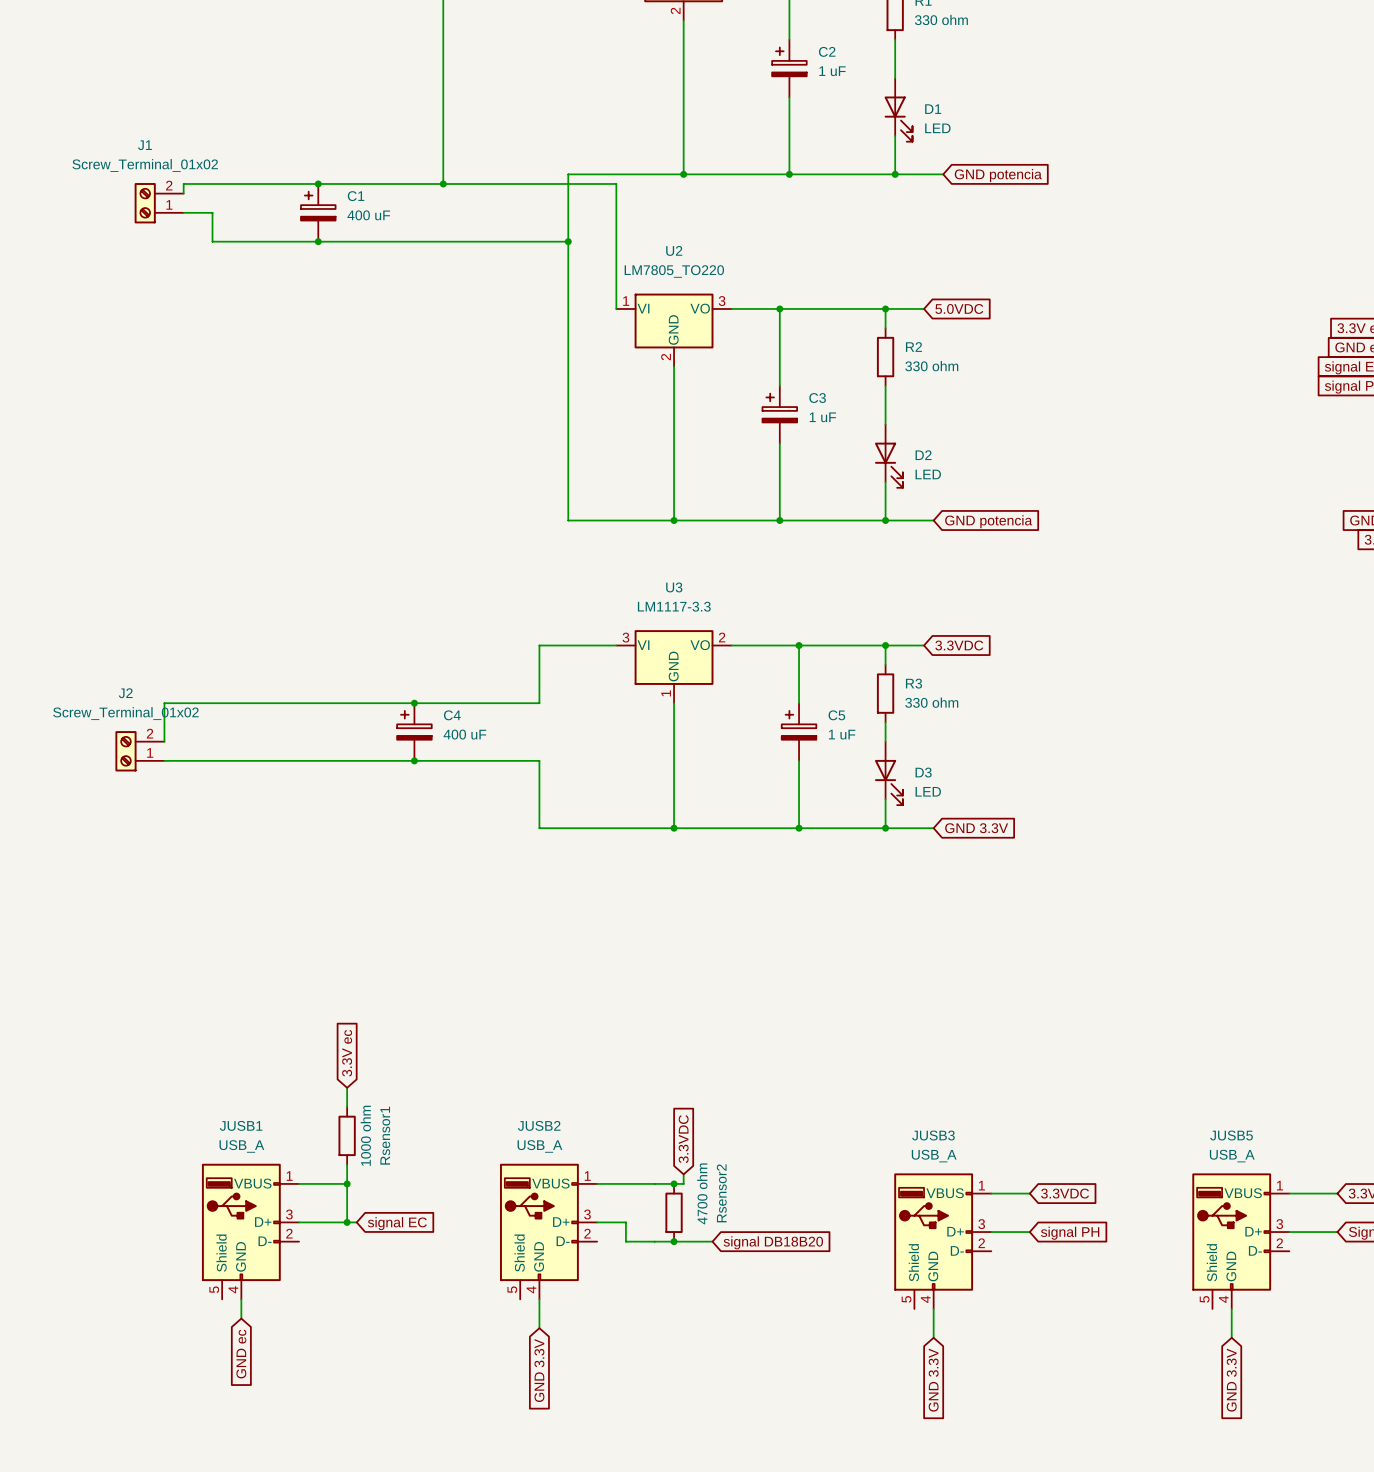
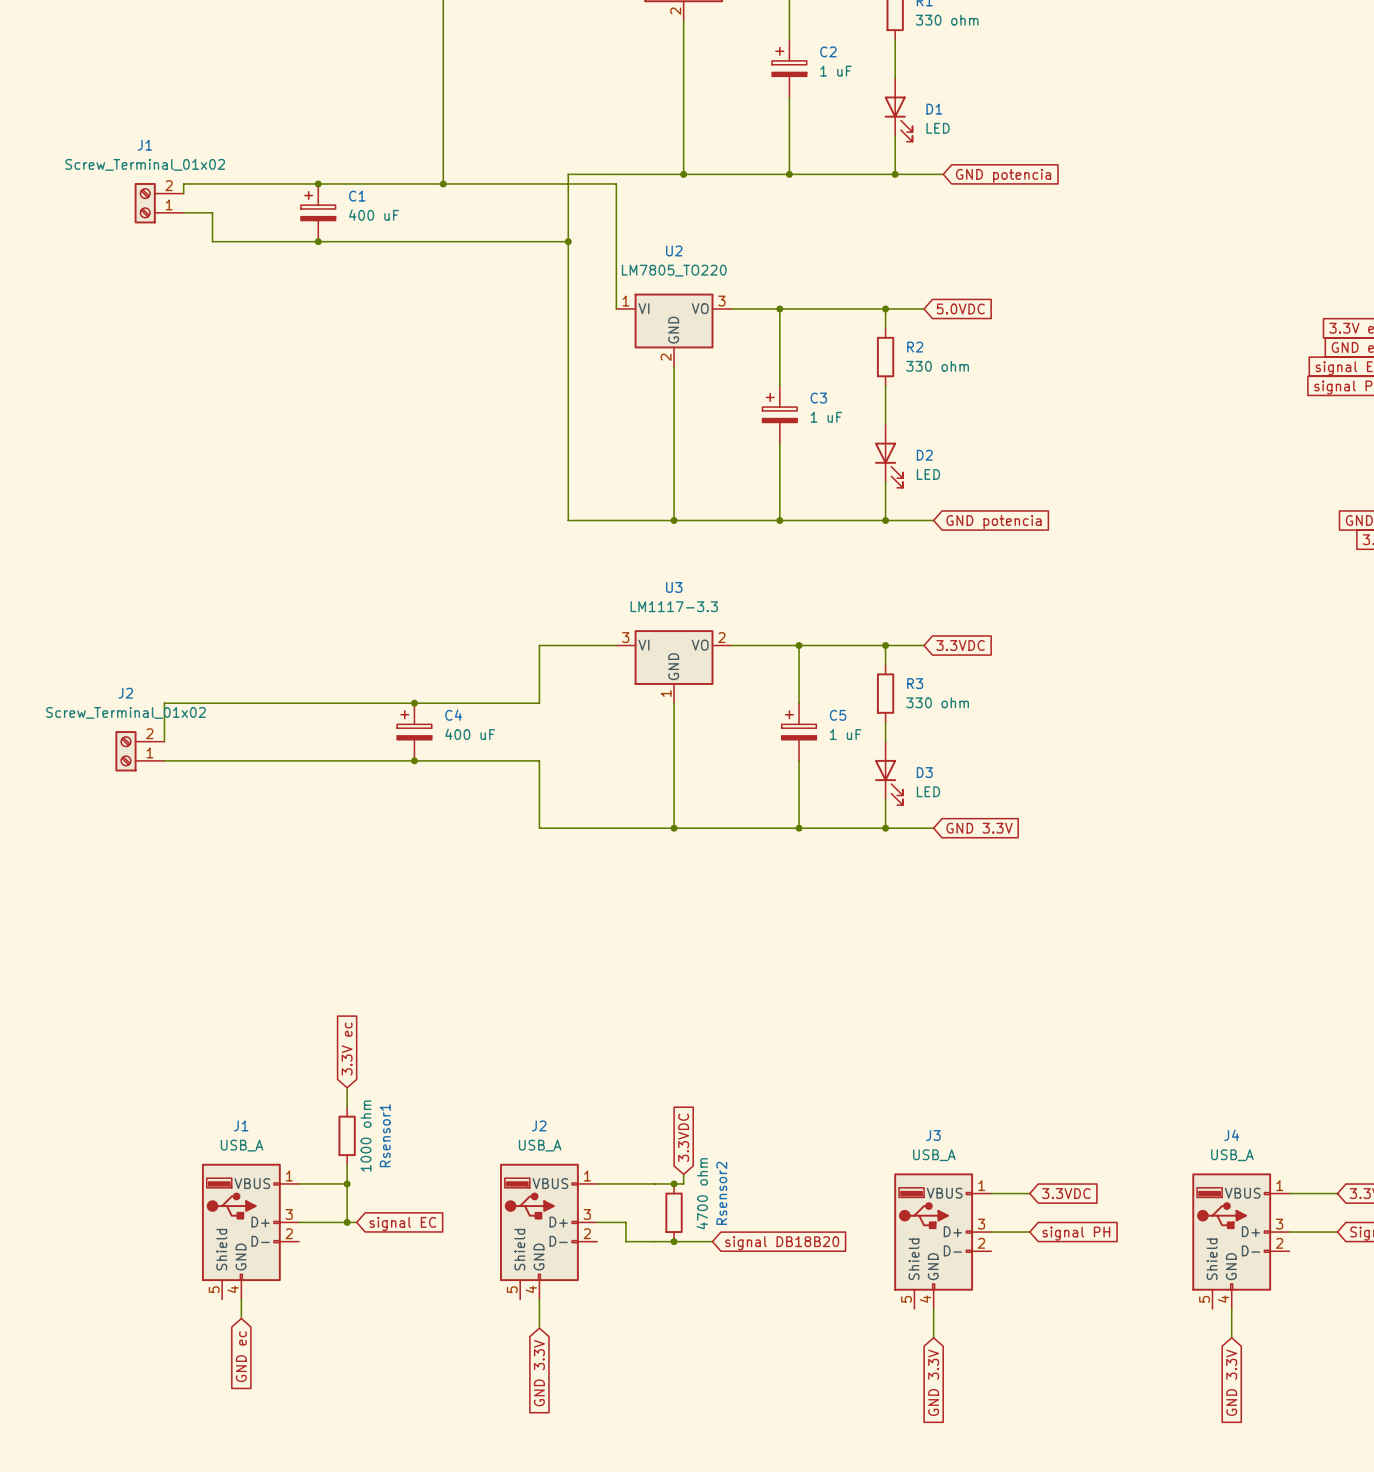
JUSB1 name: JUSB1 (241, 1125) -> J1 (241, 1125)
JUSB2 name: JUSB2 (539, 1125) -> J2 (539, 1125)
JUSB3 name: JUSB3 (933, 1135) -> J3 (933, 1135)
JUSB5 name: JUSB5 (1231, 1135) -> J4 (1231, 1135)

